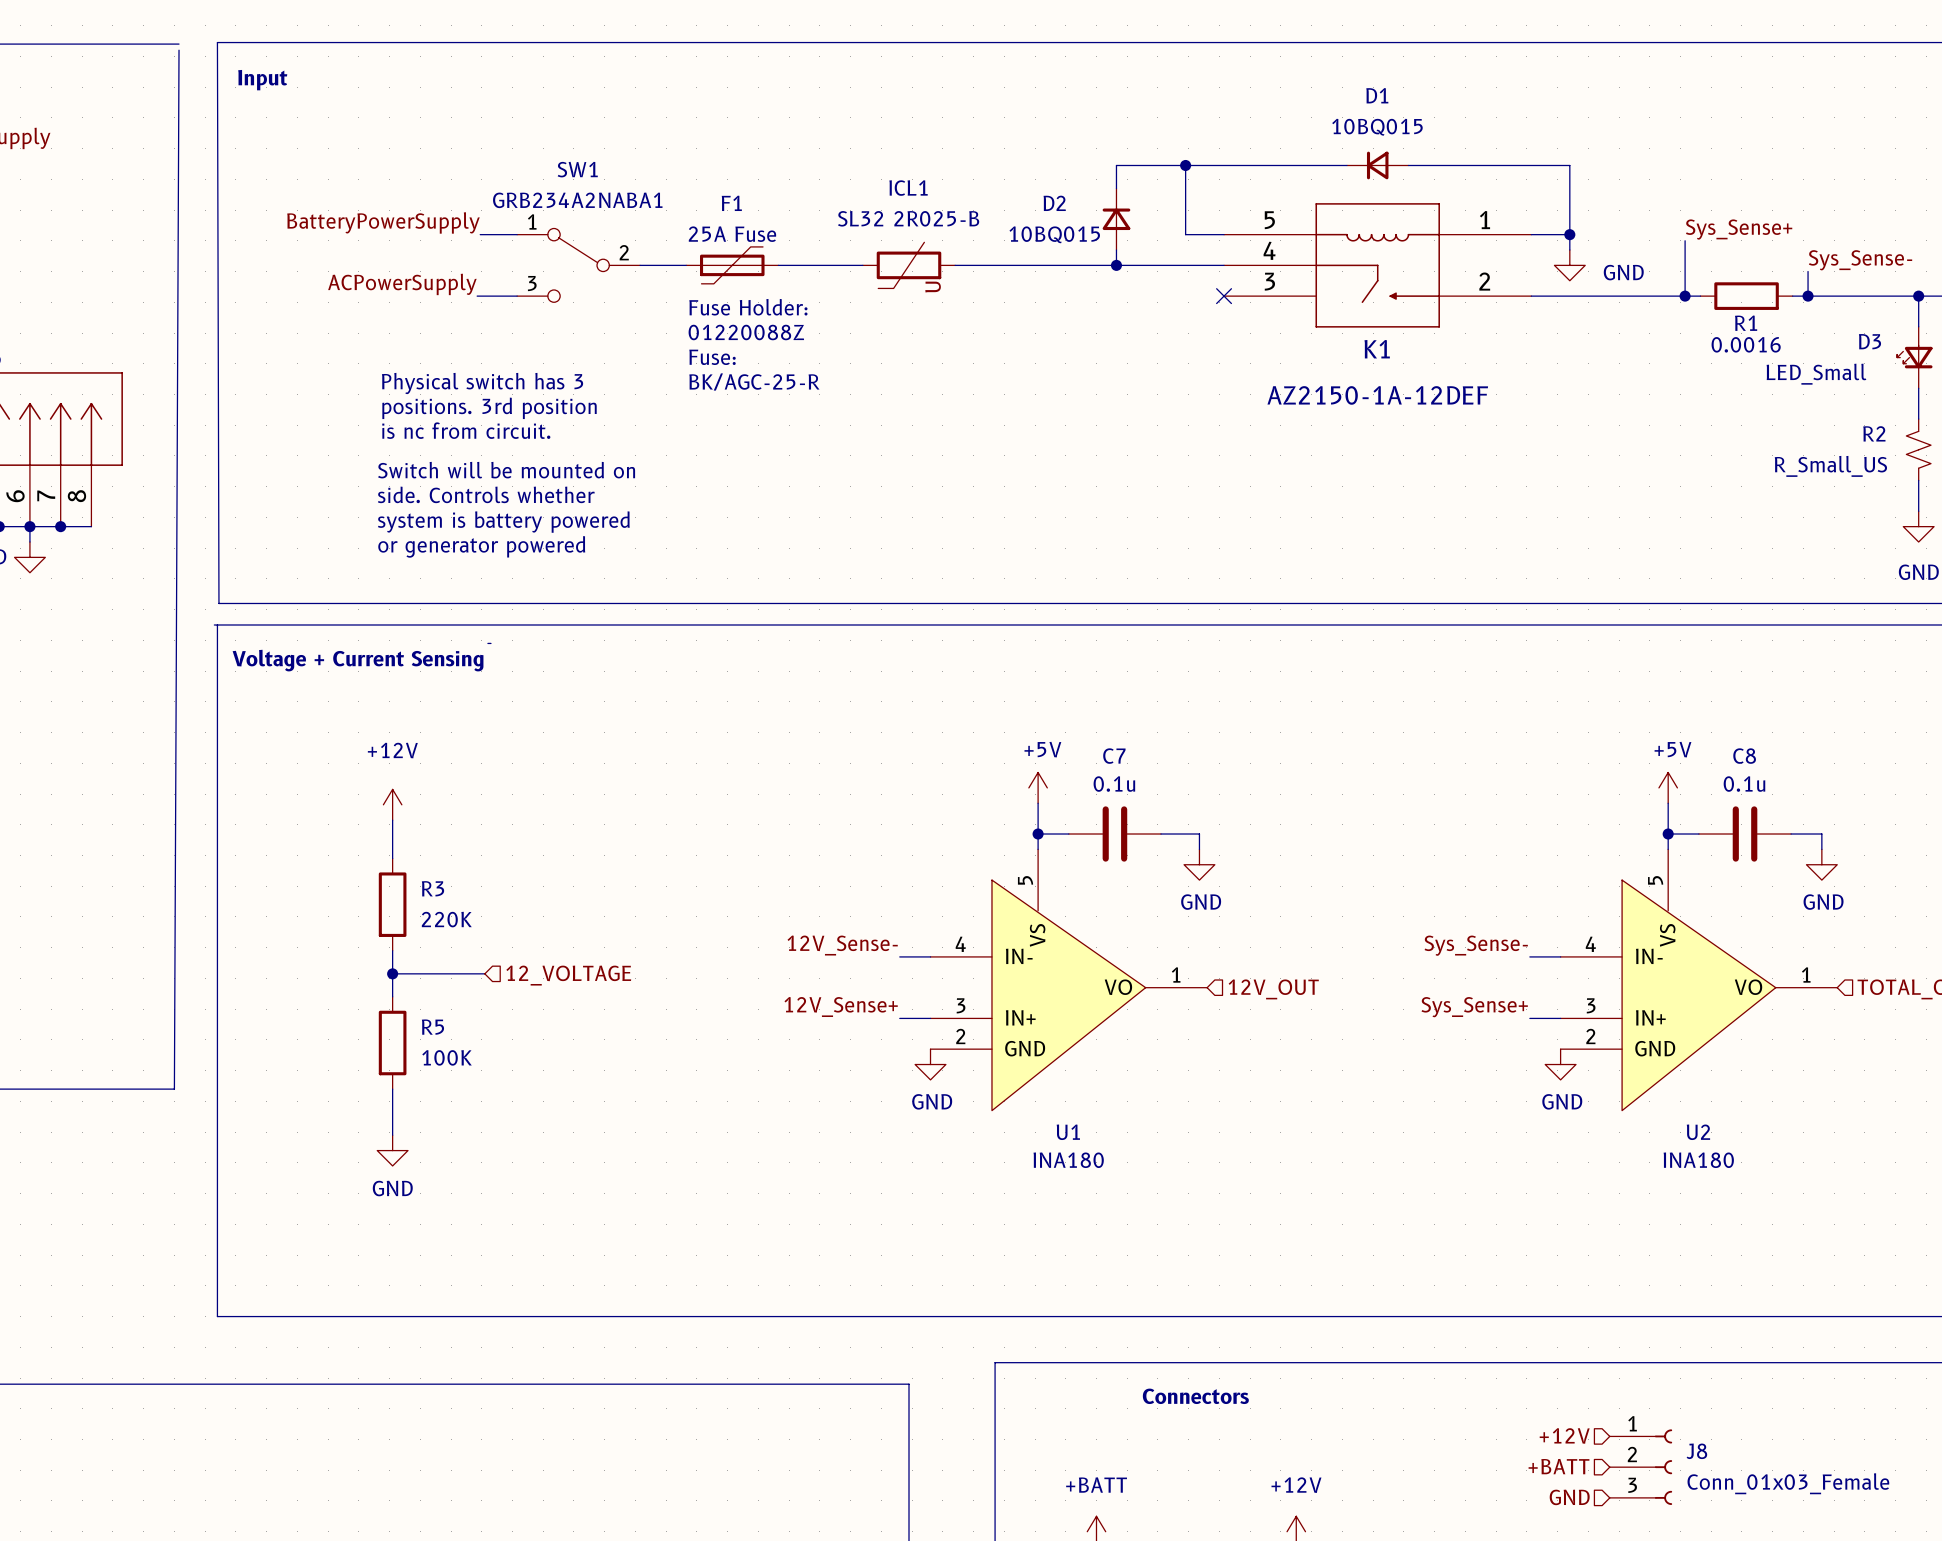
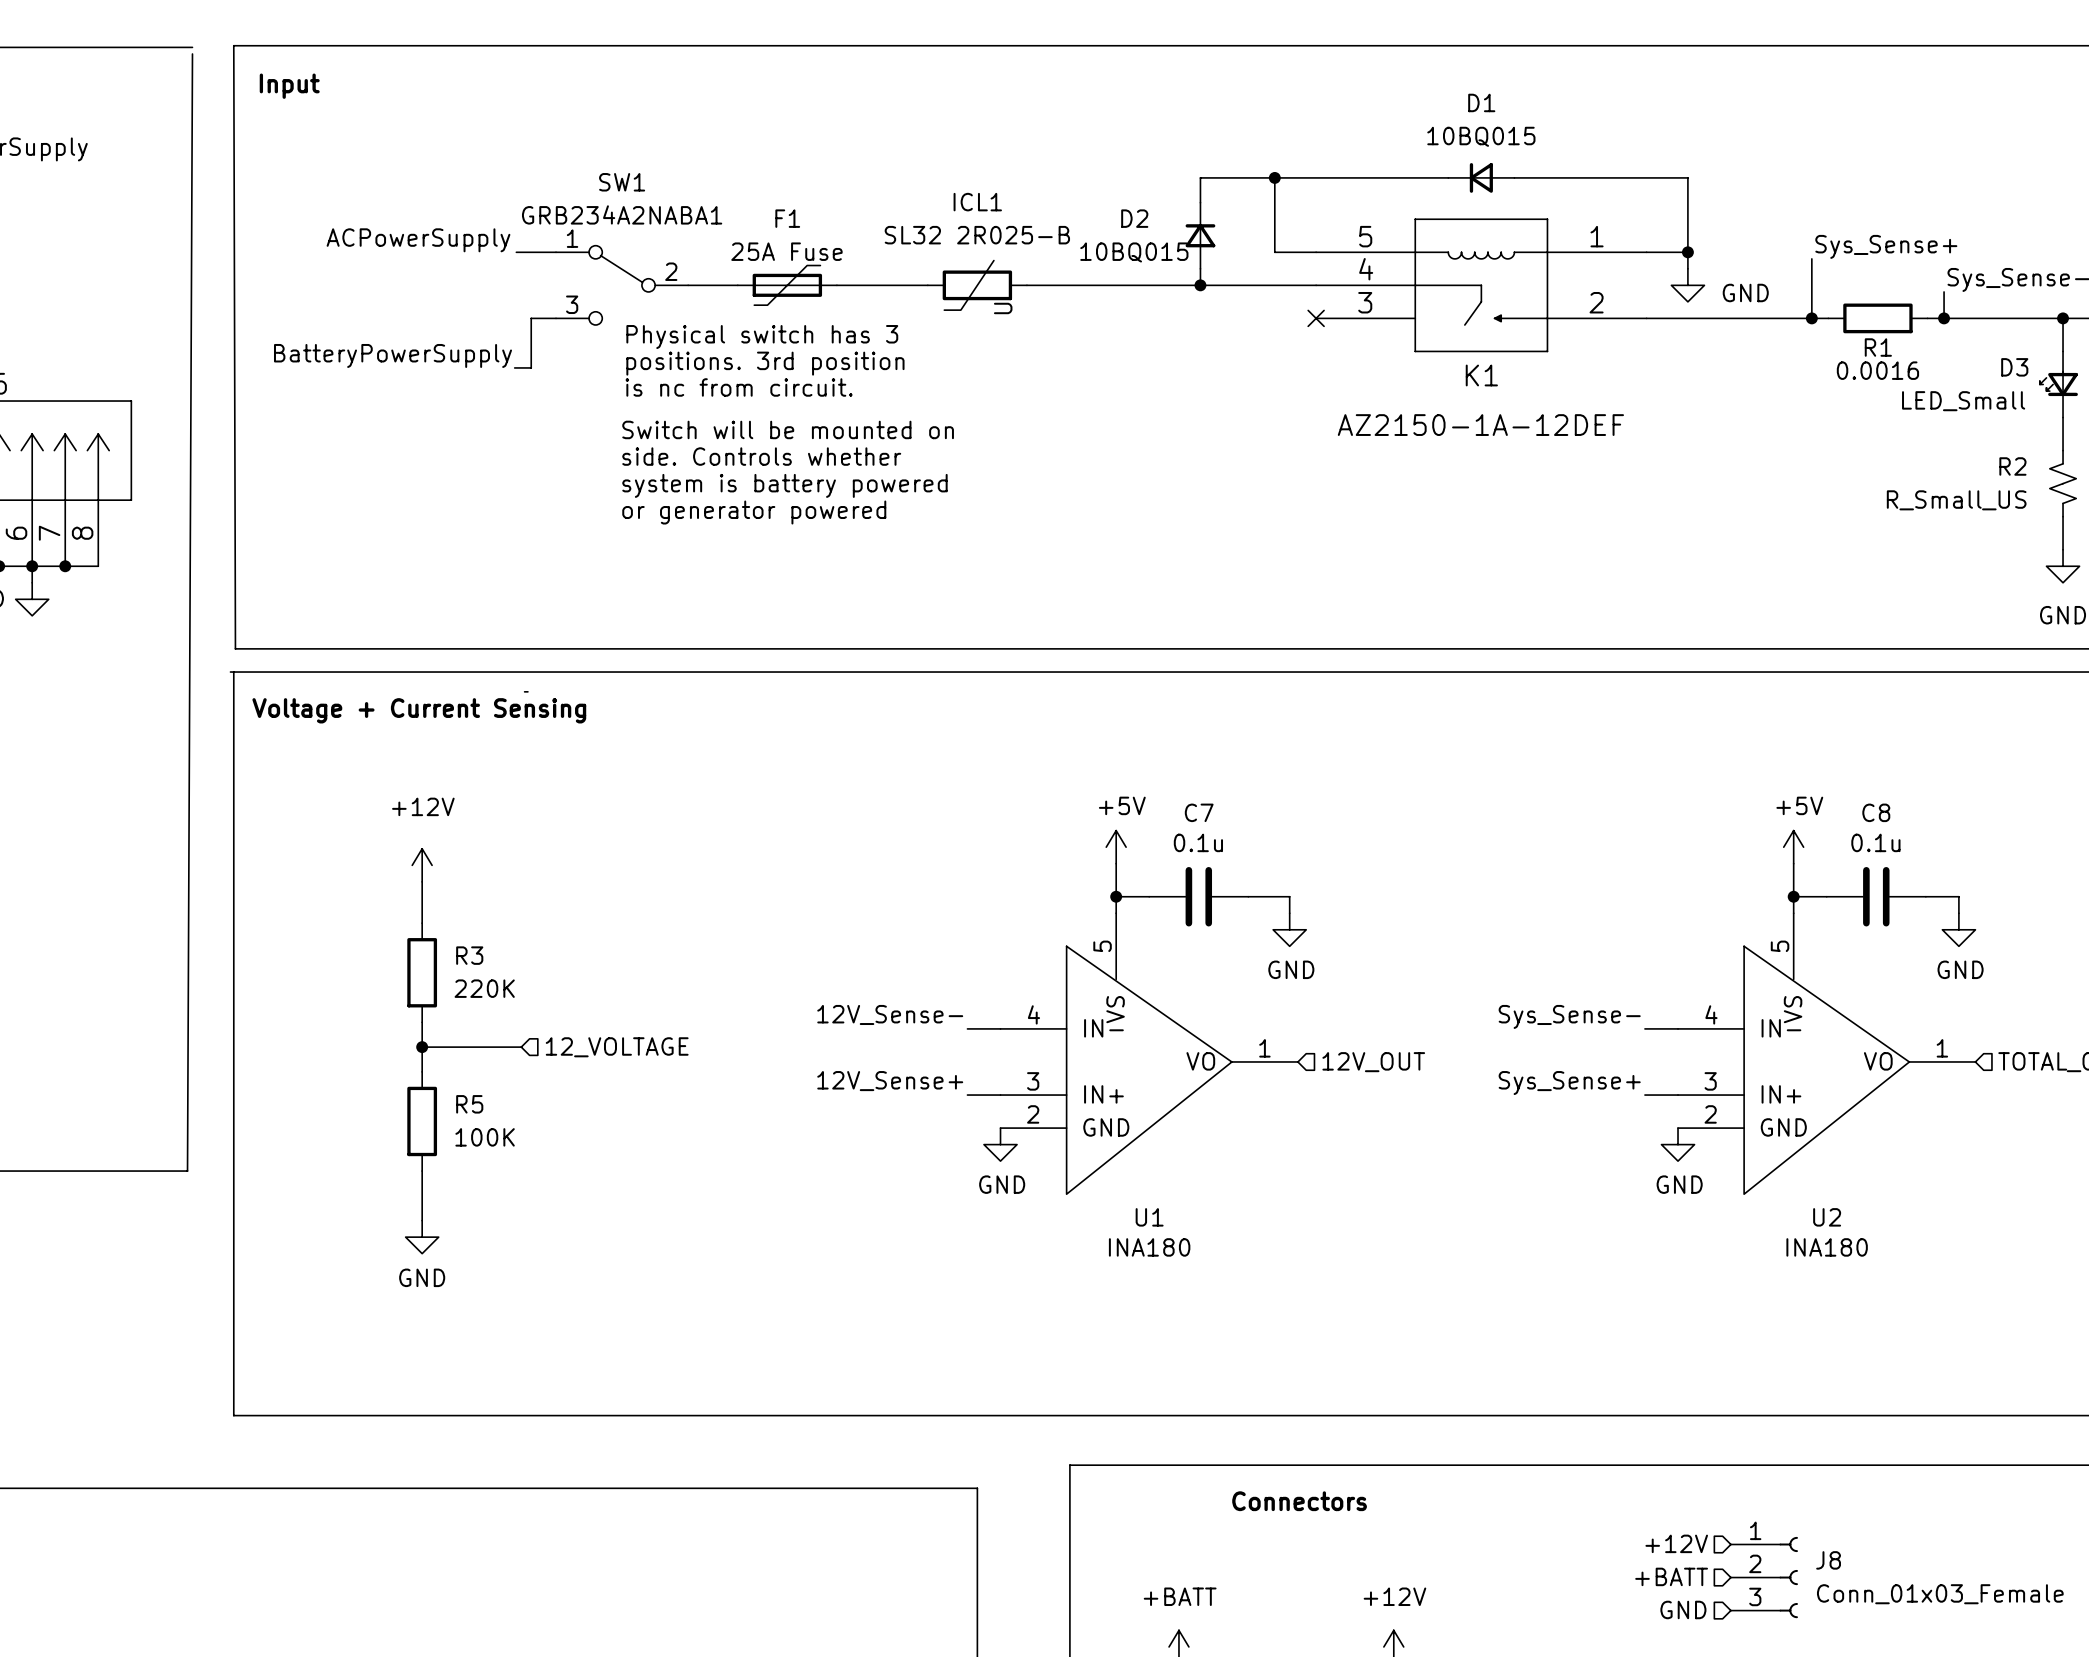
label position: BatteryPowerSupply (383, 222) -> BatteryPowerSupply (393, 355)
label position: ACPowerSupply (402, 284) -> ACPowerSupply (418, 240)
wire: (477, 296) (494, 296) -> (514, 367) (531, 367) (531, 318)
text: Fuse Holder: (748, 307) -> none
text: 01220088Z (746, 332) -> none
text: Fuse: (712, 357) -> none
text: BK/AGC-25-R (754, 381) -> none
text position: Physical switch has 3 (482, 383) -> Physical switch has 3 (762, 337)
text position: positions. 3rd position (489, 408) -> positions. 3rd position (765, 363)
text position: is nc from circuit. (466, 430) -> is nc from circuit. (739, 387)
text position: Switch will be mounted on (506, 470) -> Switch will be mounted on (788, 429)
text position: side. Controls whether (486, 494) -> side. Controls whether (761, 456)
text position: system is battery powered (503, 522) -> system is battery powered (784, 485)
text position: or generator powered (481, 546) -> or generator powered (754, 512)

